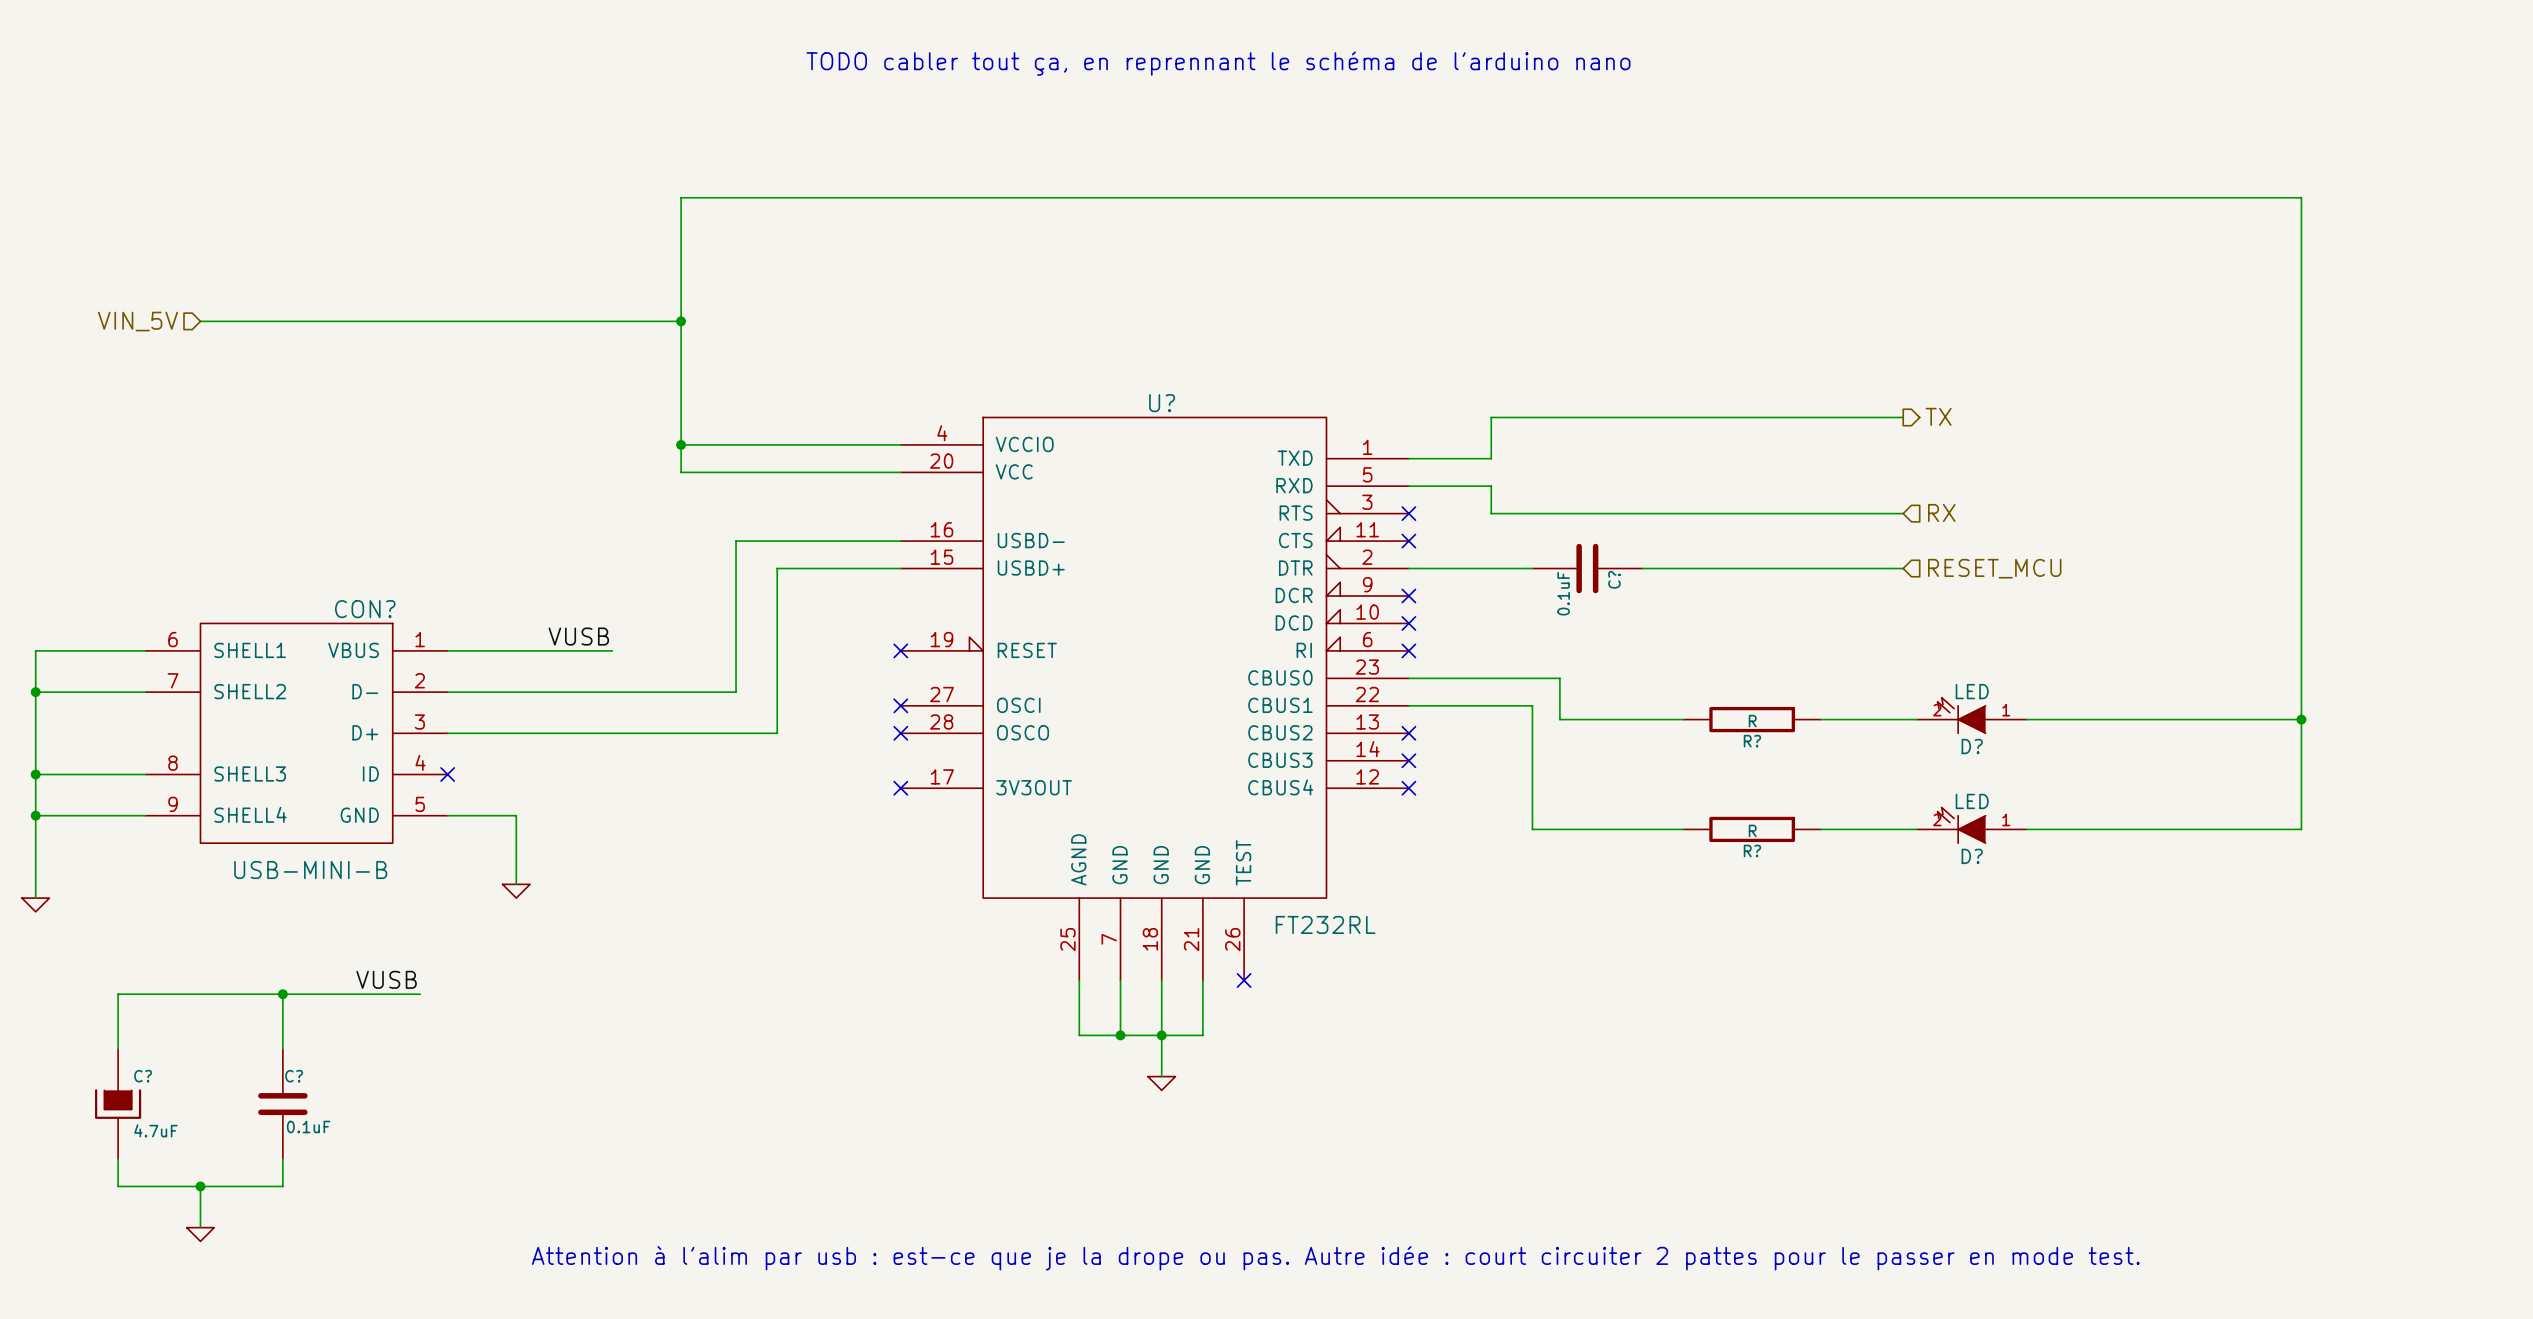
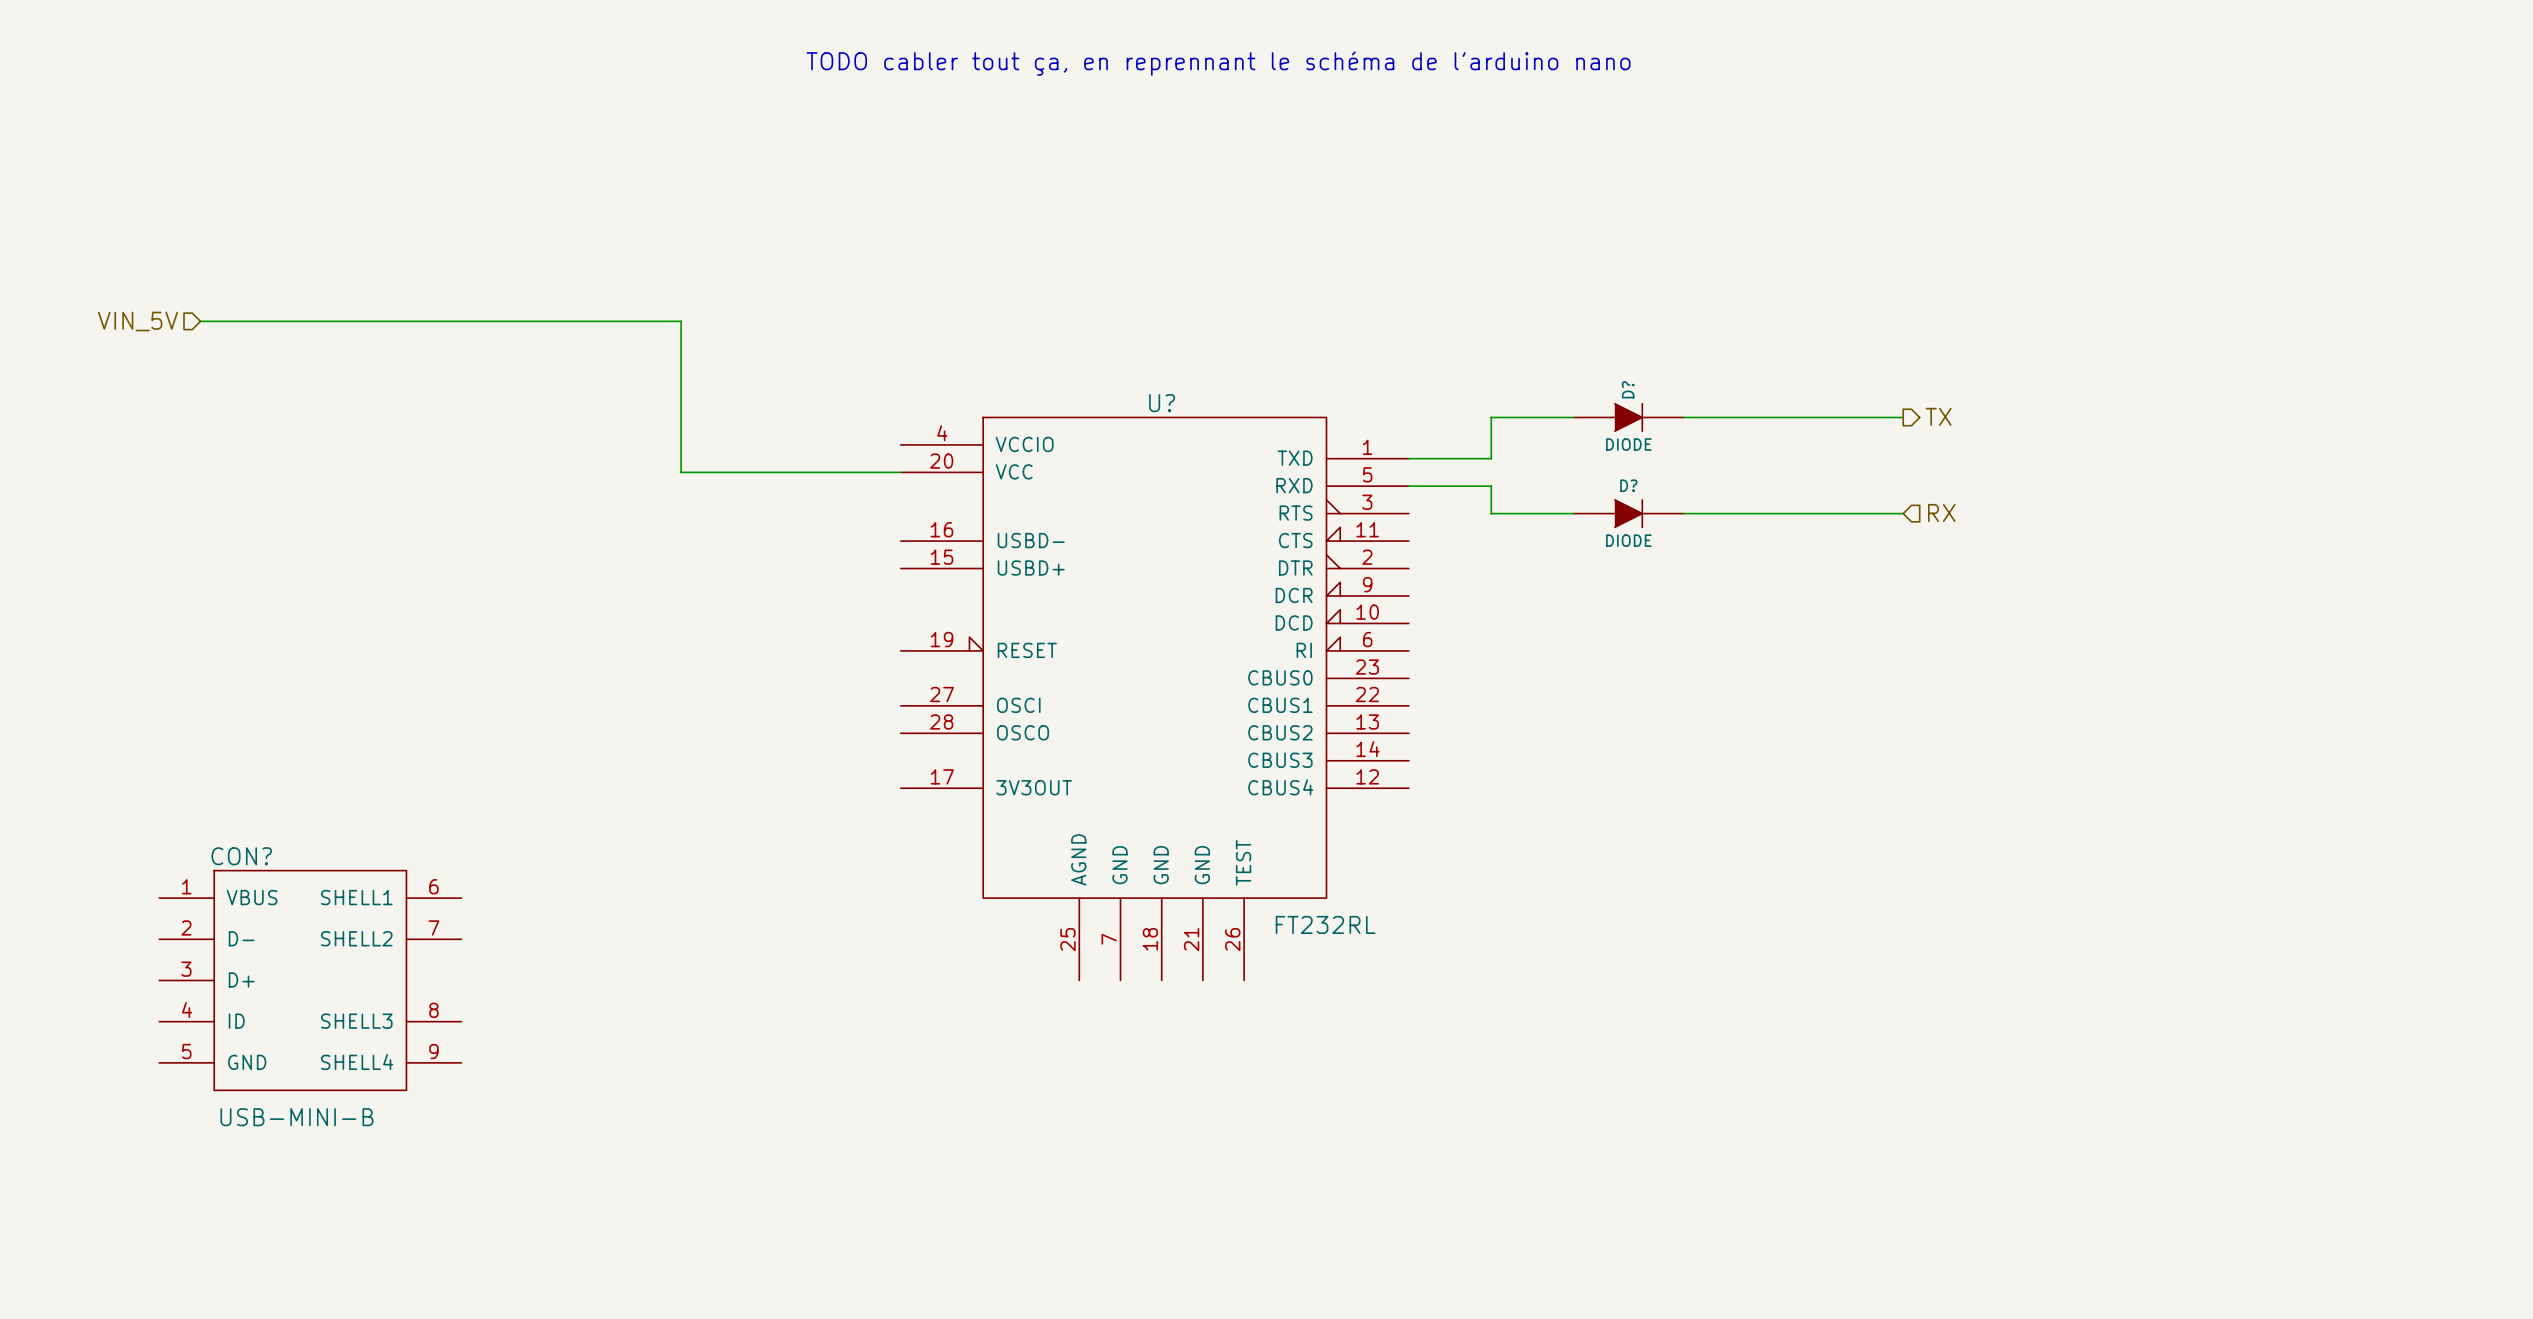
wire: (681, 321) (681, 197) (2301, 197) (2301, 829) (2026, 829) -> none
junction: (681, 321) -> none
D?: none -> DIODE (1628, 417)
wire: (681, 444) (900, 444) -> none
junction: (681, 444) -> none
no-connect mark: (1408, 513) -> none
D?: none -> DIODE (1628, 513)
wire: (900, 541) (736, 541) (736, 692) (447, 692) -> none
no-connect mark: (1408, 541) -> none
wire: (900, 568) (777, 568) (777, 733) (447, 733) -> none
wire: (1408, 568) (1532, 568) -> none
C?: 0.1uF (1587, 568) -> none
wire: (1642, 568) (1903, 568) -> none
hierarchical label: RESET_MCU (1994, 568) -> none
no-connect mark: (1408, 595) -> none
no-connect mark: (1408, 623) -> none
label: VUSB (578, 636) -> none
wire: (145, 650) (35, 650) (35, 898) -> none
wire: (447, 650) (612, 650) -> none
no-connect mark: (900, 650) -> none
no-connect mark: (1408, 650) -> none
wire: (1408, 678) (1559, 678) (1559, 719) (1683, 719) -> none
wire: (35, 692) (145, 692) -> none
junction: (35, 692) -> none
no-connect mark: (900, 705) -> none
wire: (1408, 705) (1532, 705) (1532, 829) (1683, 829) -> none
D?: LED (1971, 715) -> none
R?: R (1752, 719) -> none
wire: (1820, 719) (1916, 719) -> none
wire: (2026, 719) (2301, 719) -> none
junction: (2301, 719) -> none
CON?: USB-MINI-B (296, 733) -> none
no-connect mark: (900, 733) -> none
no-connect mark: (1408, 733) -> none
no-connect mark: (1408, 760) -> none
wire: (35, 774) (145, 774) -> none
junction: (35, 774) -> none
no-connect mark: (447, 774) -> none
no-connect mark: (900, 788) -> none
no-connect mark: (1408, 788) -> none
wire: (35, 815) (145, 815) -> none
junction: (35, 815) -> none
wire: (447, 815) (516, 815) (516, 884) -> none
D?: LED (1971, 825) -> none
R?: R (1752, 829) -> none
wire: (1820, 829) (1916, 829) -> none
power symbol: (516, 891) -> none
power symbol: (35, 904) -> none
label: VUSB (386, 979) -> none
CON?: none -> USB-MINI-B (310, 980)
wire: (1079, 980) (1079, 1035) (1202, 1035) (1202, 980) -> none
wire: (1120, 980) (1120, 1035) -> none
wire: (1161, 980) (1161, 1076) -> none
no-connect mark: (1244, 980) -> none
wire: (282, 994) (282, 1049) -> none
junction: (282, 994) -> none
wire: (420, 994) (118, 994) (118, 1049) -> none
junction: (1120, 1035) -> none
junction: (1161, 1035) -> none
power symbol: (1161, 1083) -> none
C?: 4.7uF (118, 1104) -> none
C?: 0.1uF (282, 1104) -> none
wire: (118, 1158) (118, 1186) (282, 1186) (282, 1158) -> none
wire: (200, 1186) (200, 1227) -> none
junction: (200, 1186) -> none
power symbol: (200, 1234) -> none
text: Attention à l'alim par usb : est-ce que je la drope ou pas. Autre idée : court circuiter 2 pattes pour le passer en mode test. (1335, 1258) -> none

